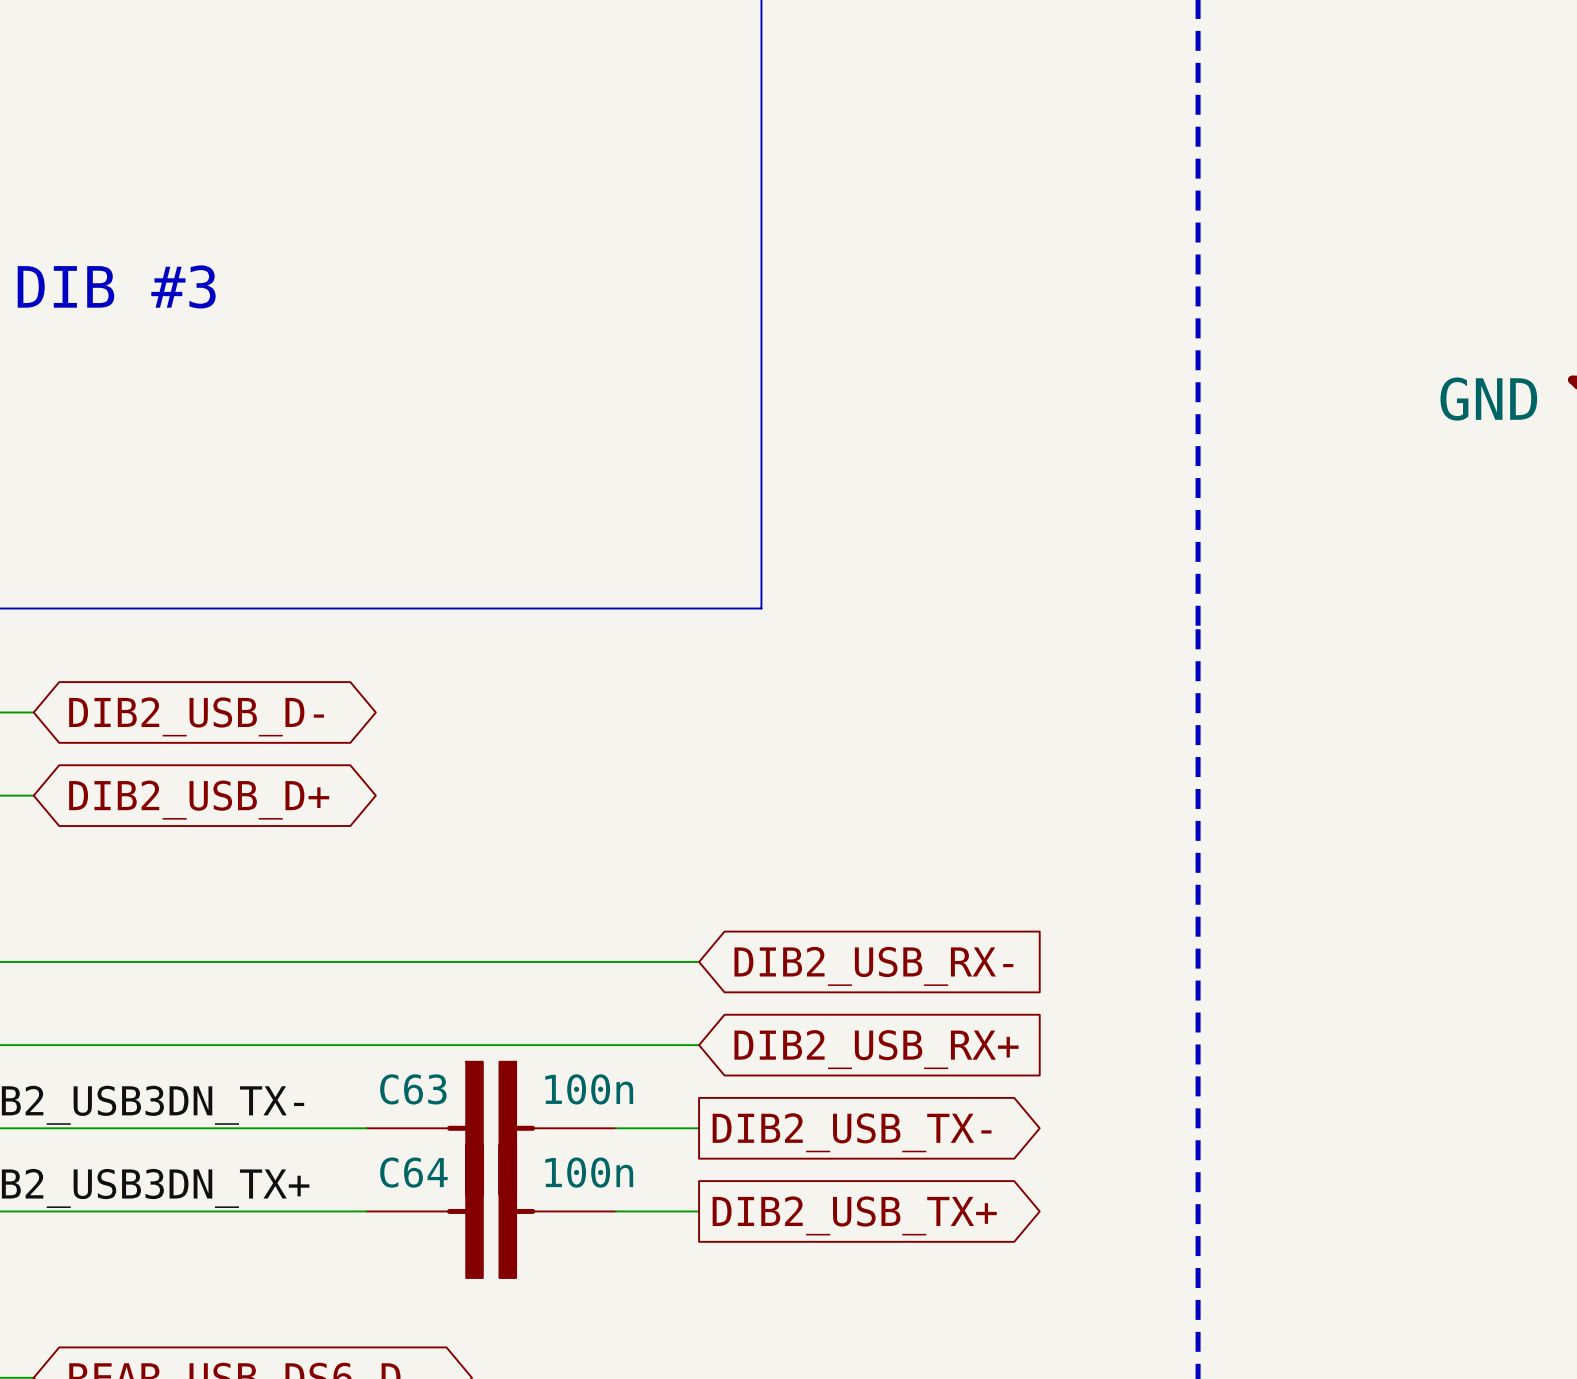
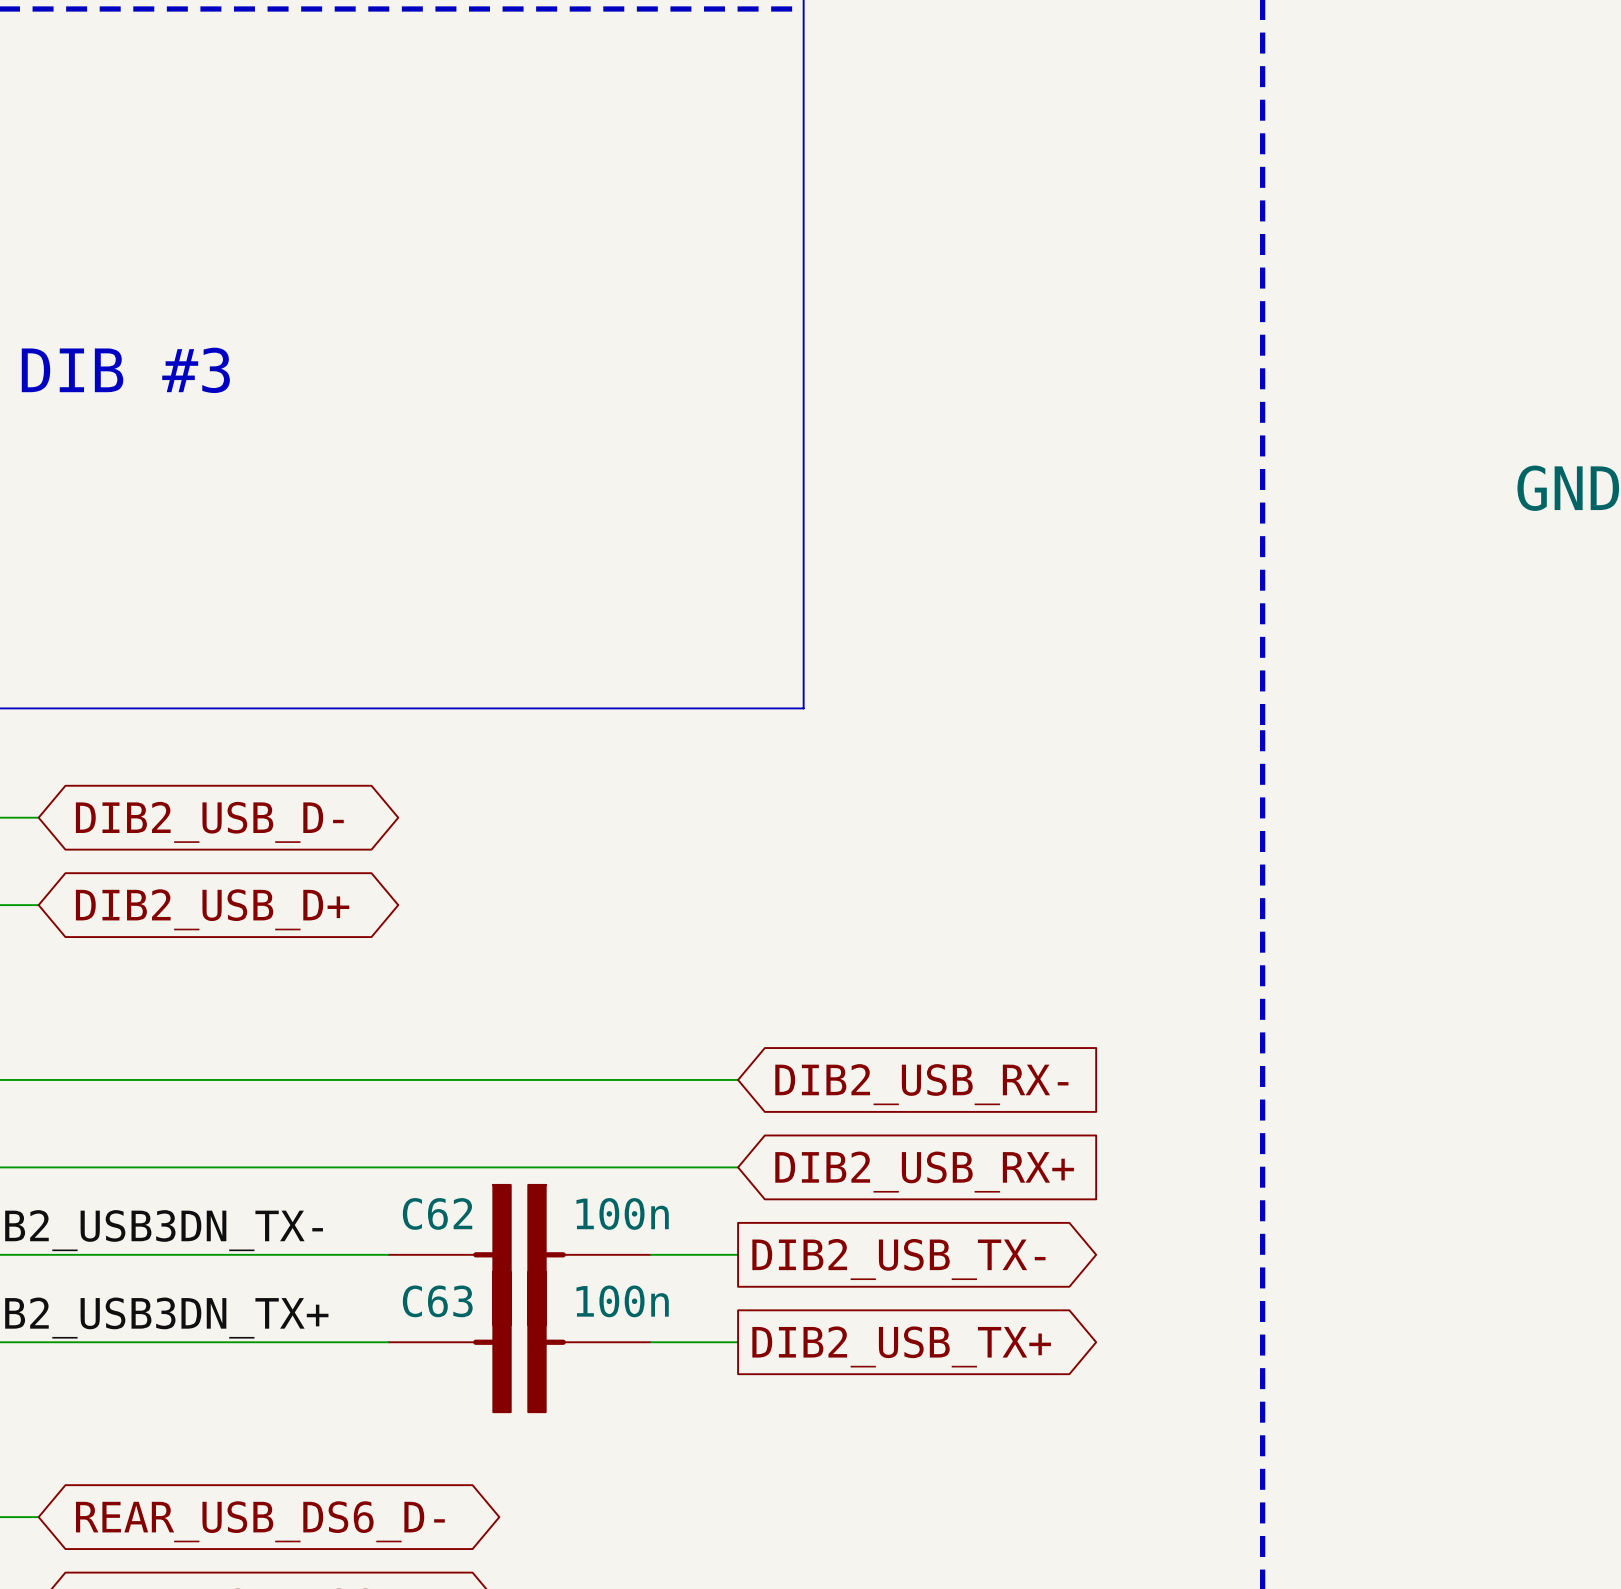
C63 name: C63 (413, 1089) -> C62 (437, 1213)
C64 name: C64 (413, 1172) -> C63 (437, 1301)

